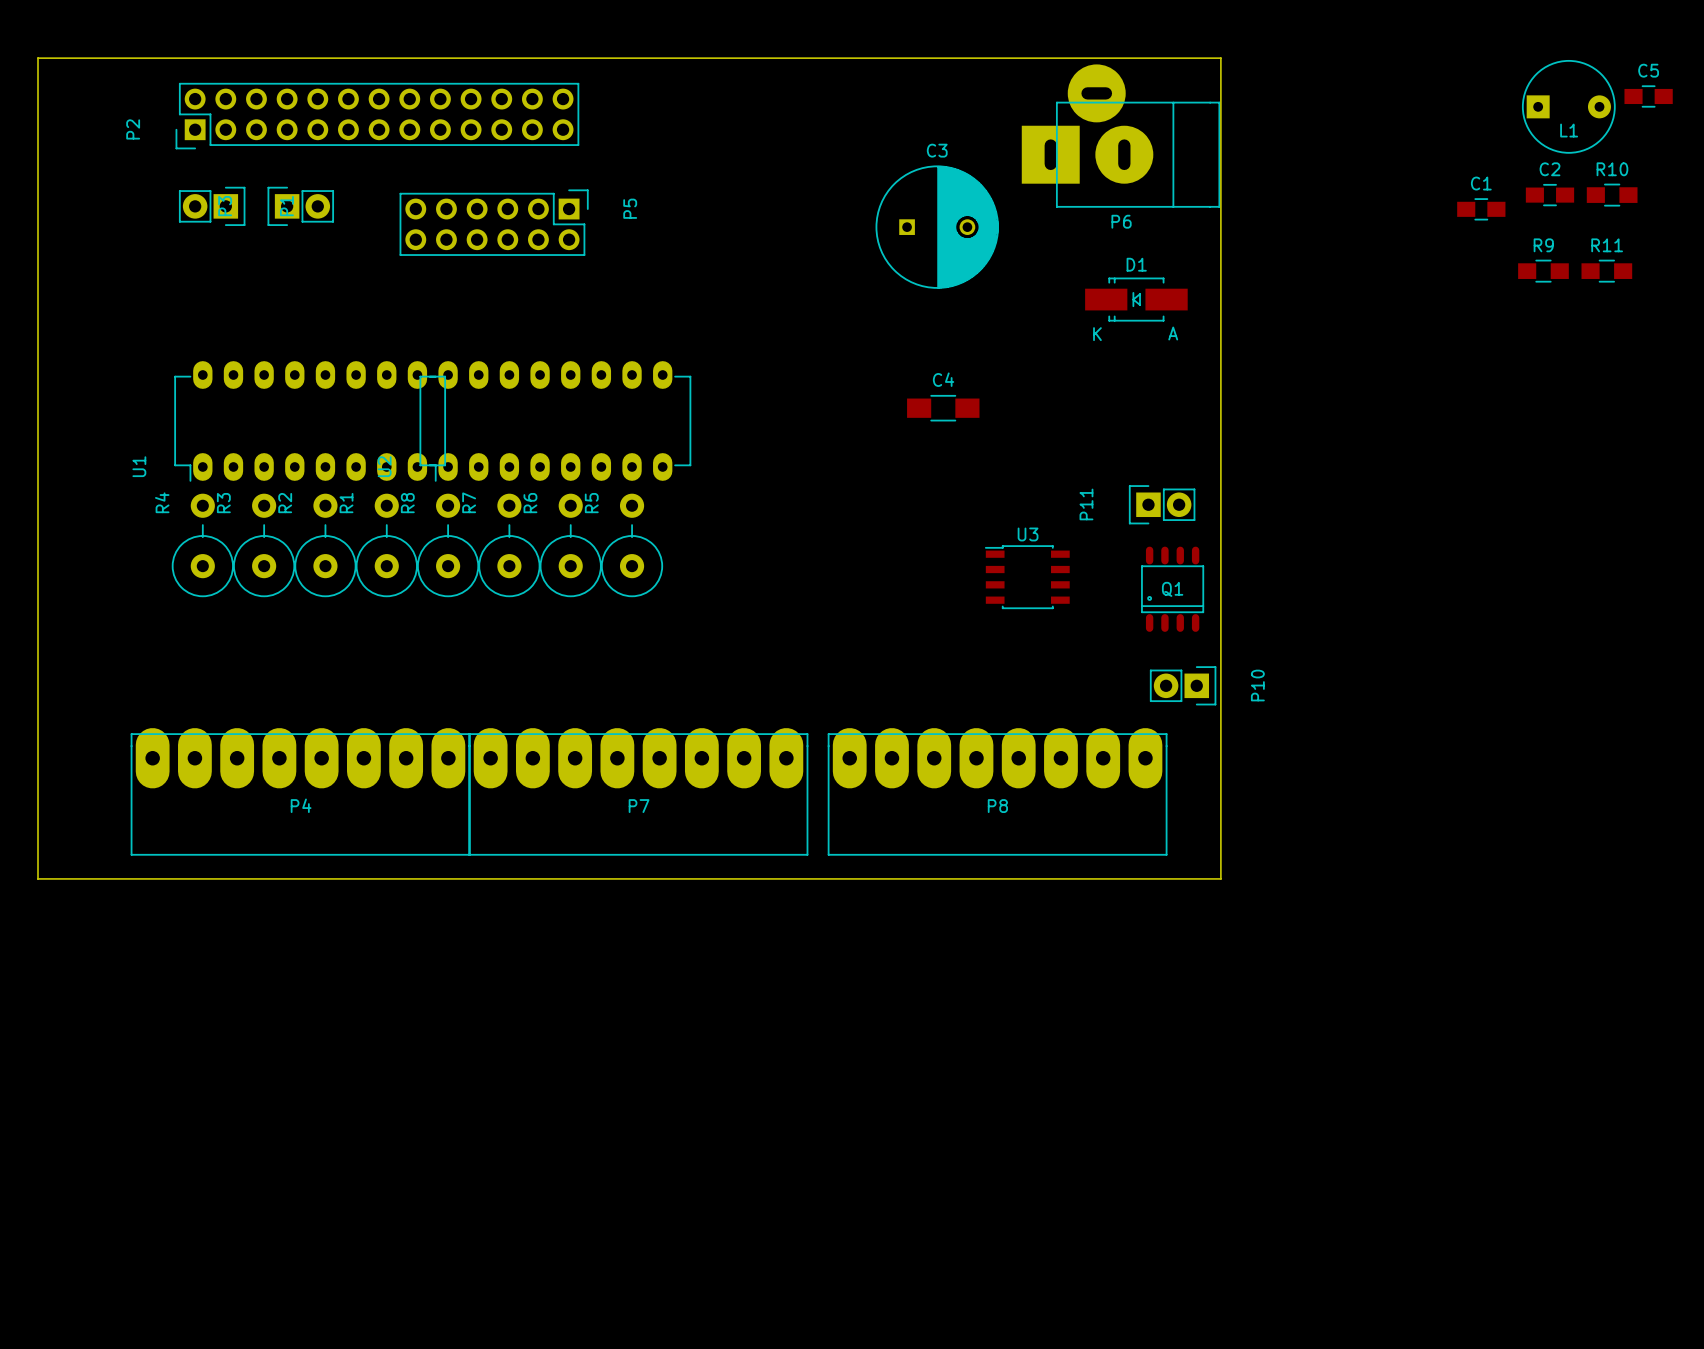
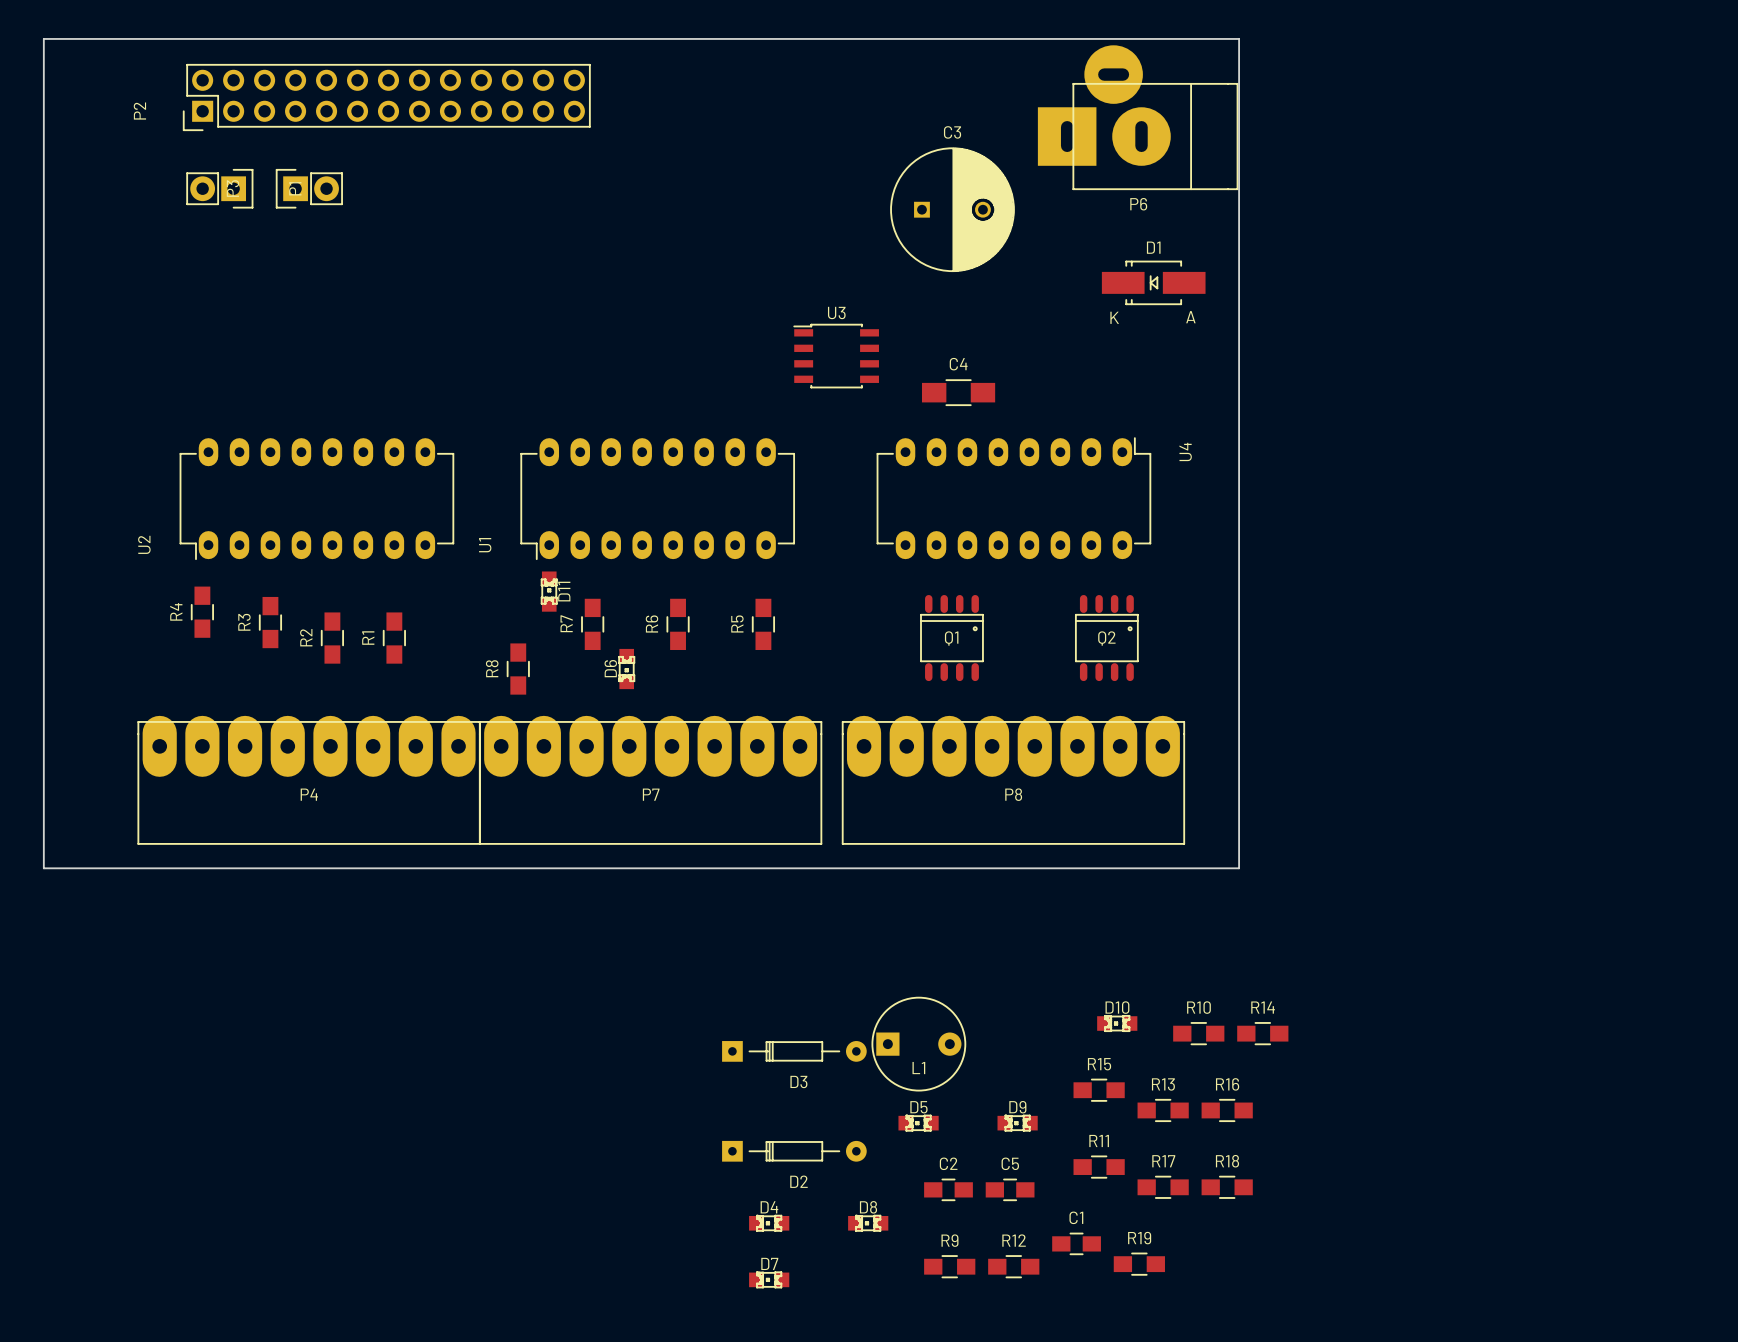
C5 position: (1648, 96) -> (1010, 1189)
L1 position: (1568, 106) -> (918, 1044)
C2 position: (1549, 195) -> (948, 1189)
R10 position: (1612, 195) -> (1198, 1033)
C1 position: (1481, 209) -> (1076, 1243)
P5: (494, 222) -> none
R9 position: (1543, 271) -> (949, 1266)
R11 position: (1606, 271) -> (1099, 1167)
U1 position: (310, 421) -> (657, 499)
U2 position: (555, 421) -> (316, 499)
R4 footprint: [171, 493, 234, 598] -> [190, 586, 214, 638]
R3 footprint: [233, 493, 296, 598] -> [258, 596, 283, 649]
R2 footprint: [294, 493, 357, 598] -> [320, 612, 344, 664]
R1 footprint: [355, 493, 418, 598] -> [382, 612, 406, 664]
R8 footprint: [417, 493, 480, 598] -> [506, 643, 530, 695]
R7 footprint: [478, 493, 541, 598] -> [581, 598, 605, 651]
R6 footprint: [539, 493, 602, 598] -> [666, 598, 690, 651]
R5 footprint: [600, 493, 664, 598] -> [751, 598, 776, 651]
R4 name position: R4 (162, 502) -> R4 (176, 611)
R7 name position: R7 (469, 502) -> R7 (566, 623)
R3 name position: R3 (223, 503) -> R3 (244, 622)
R2 name position: R2 (285, 503) -> R2 (306, 637)
R1 name position: R1 (346, 503) -> R1 (368, 638)
R8 name position: R8 (407, 503) -> R8 (492, 668)
R6 name position: R6 (530, 503) -> R6 (651, 624)
R5 name position: R5 (591, 503) -> R5 (737, 624)
P11: (1162, 504) -> none
U4: none -> (1013, 498)
U3 position: (1027, 577) -> (836, 356)
Q1 rotation: 0° (1172, 589) -> 180° (951, 638)
Q1 position: (1172, 589) -> (951, 638)
D11: none -> (549, 591)
Q2: none -> (1106, 638)
D6: none -> (626, 669)
P10: (1183, 685) -> none
D10: none -> (1117, 1023)
R14: none -> (1262, 1033)
D3: none -> (794, 1051)
R15: none -> (1099, 1090)
R13: none -> (1163, 1110)
R16: none -> (1227, 1110)
D5: none -> (918, 1123)
D9: none -> (1017, 1123)
D2: none -> (794, 1151)
R17: none -> (1163, 1187)
R18: none -> (1227, 1187)
D4: none -> (769, 1223)
D8: none -> (868, 1223)
R19: none -> (1139, 1264)
R12: none -> (1013, 1266)
D7: none -> (769, 1279)

